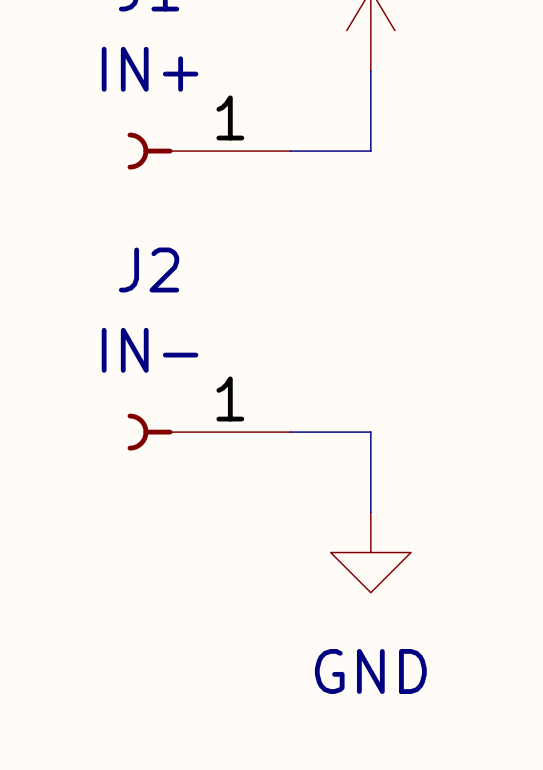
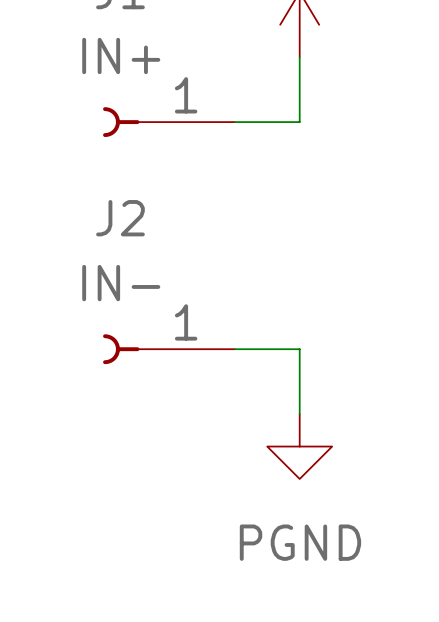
power symbol: GND (370, 552) -> PGND (299, 446)

